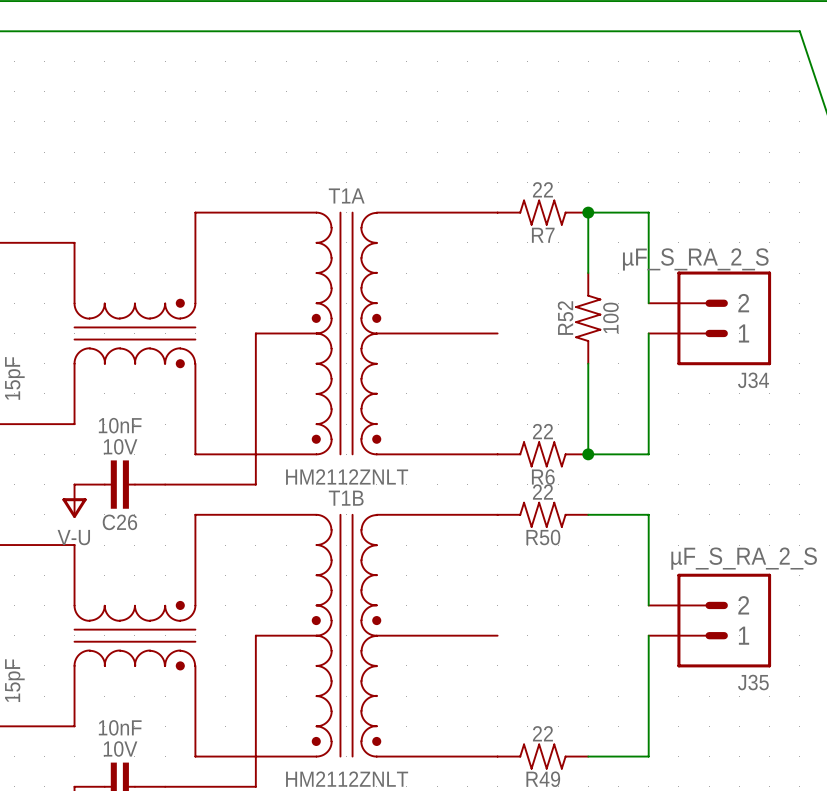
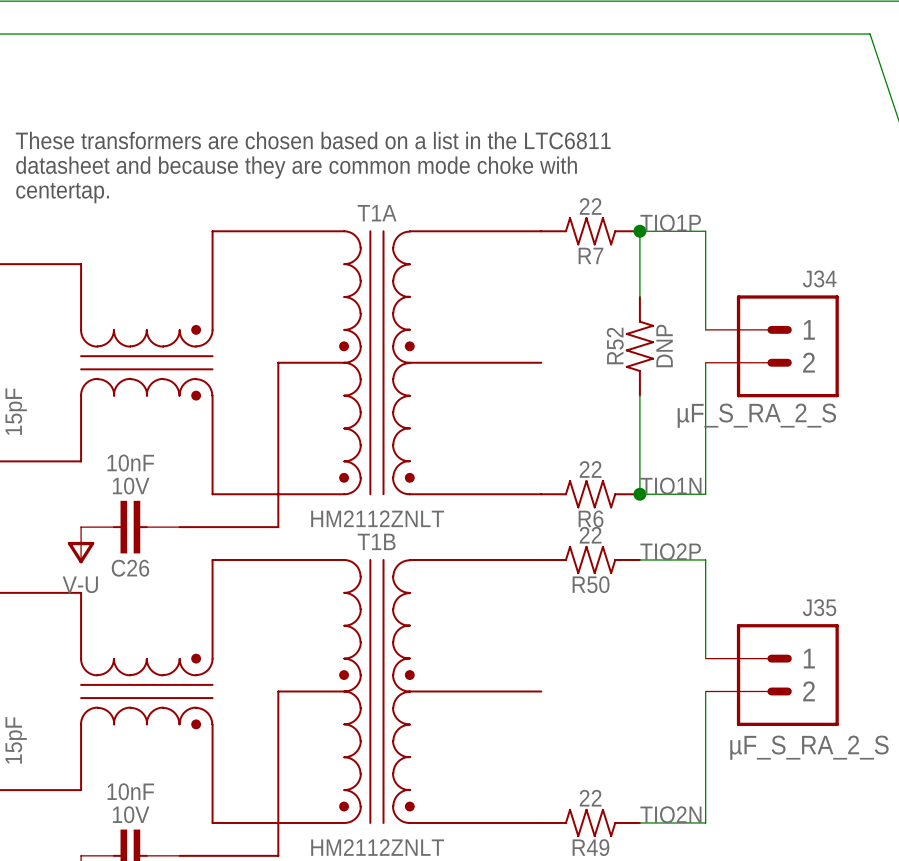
text: none -> These transformers are chosen based on a list in the LTC6811 (313, 140)
text: none -> datasheet and because they are common mode choke with (296, 167)
text: none -> centertap. (62, 193)
label: none -> TIO1P (670, 223)
R52 text: 100 (610, 318) -> DNP (664, 346)
J34 flip: as is (724, 318) -> up-down (787, 346)
label: none -> TIO1N (670, 486)
label: none -> TIO2P (670, 551)
J35 flip: as is (724, 620) -> up-down (787, 675)
label: none -> TIO2N (670, 814)

